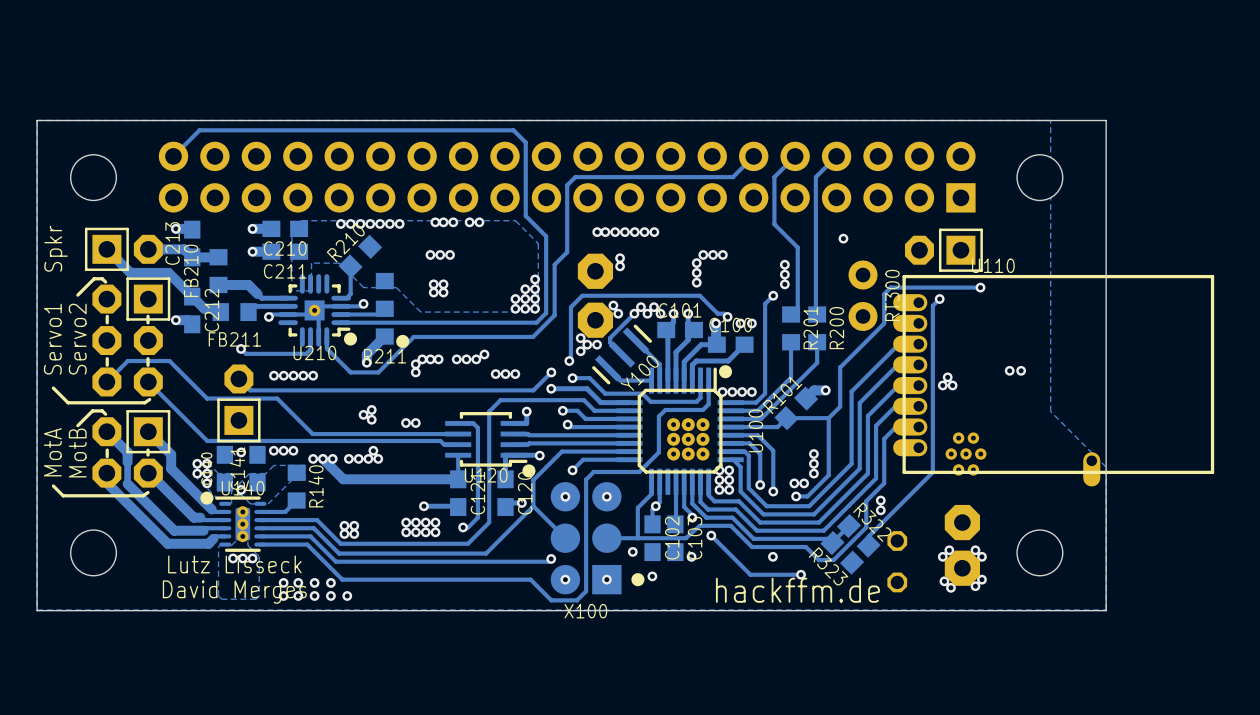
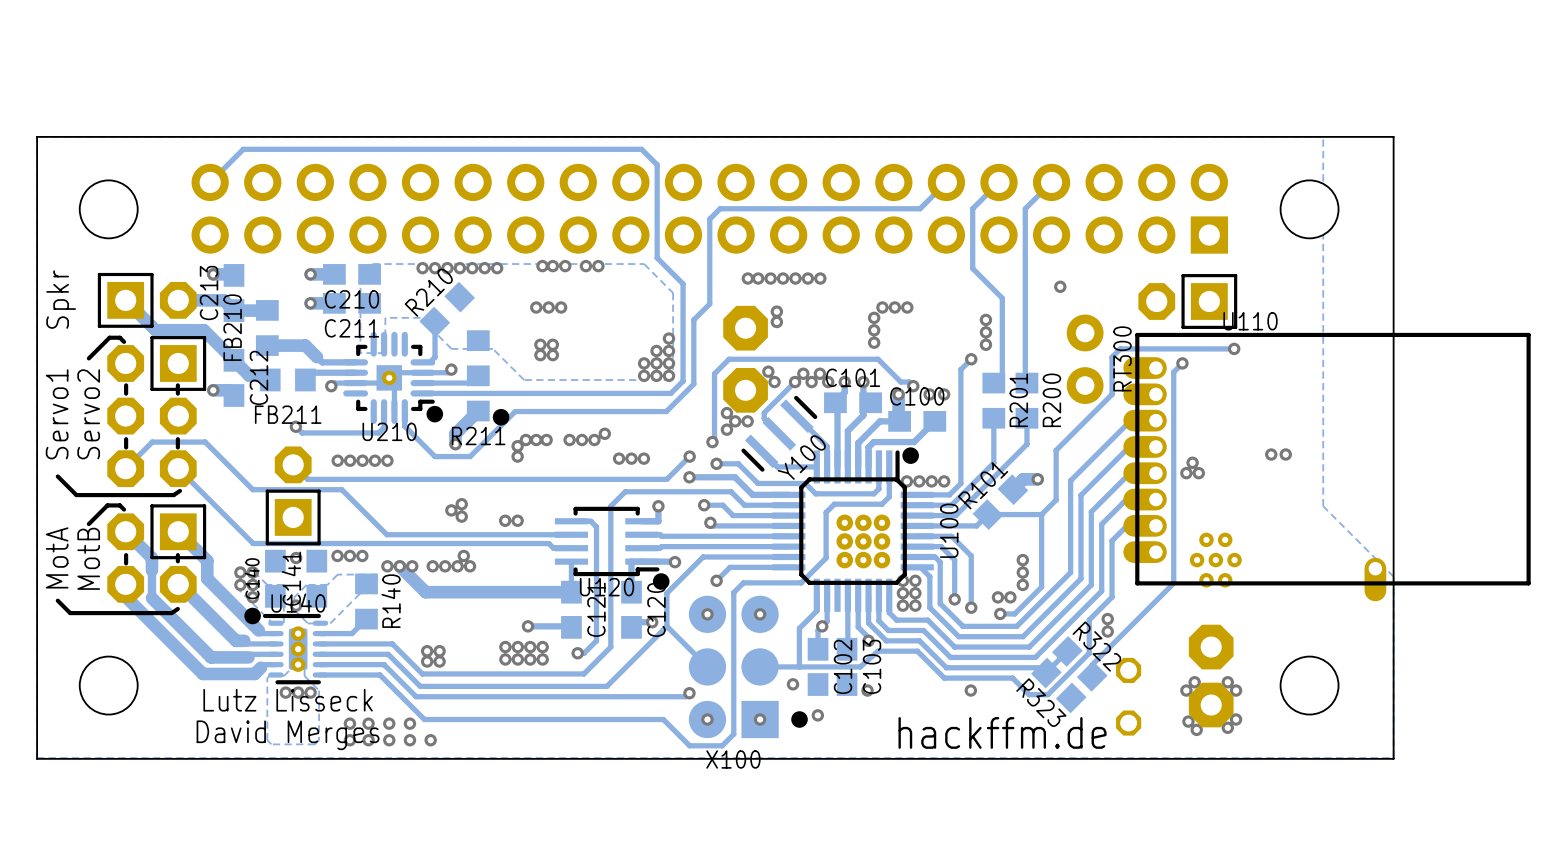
track: (711, 535) (750, 574) (801, 574) -> none
via: (711, 535) -> none
via: (801, 574) -> none

